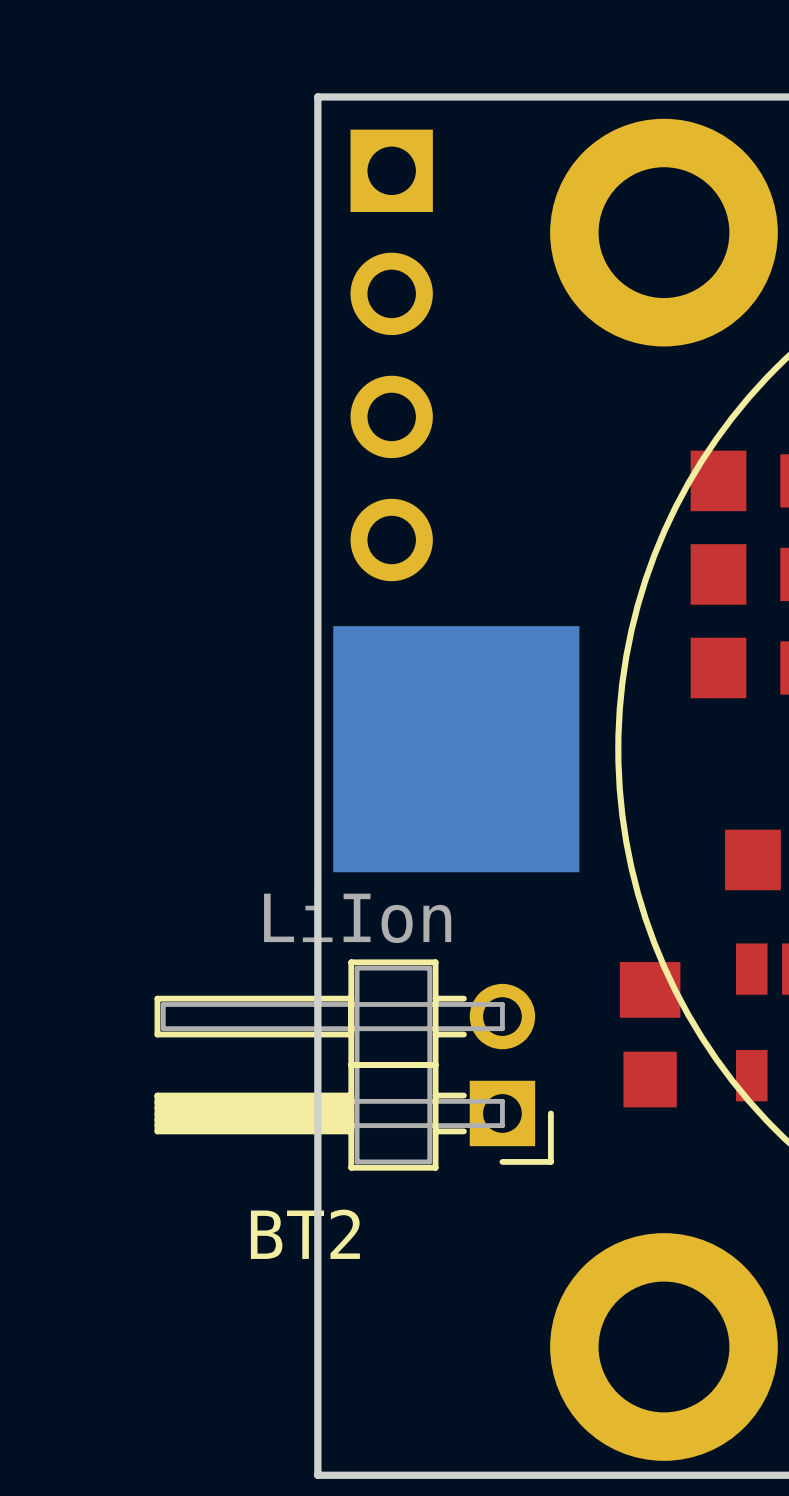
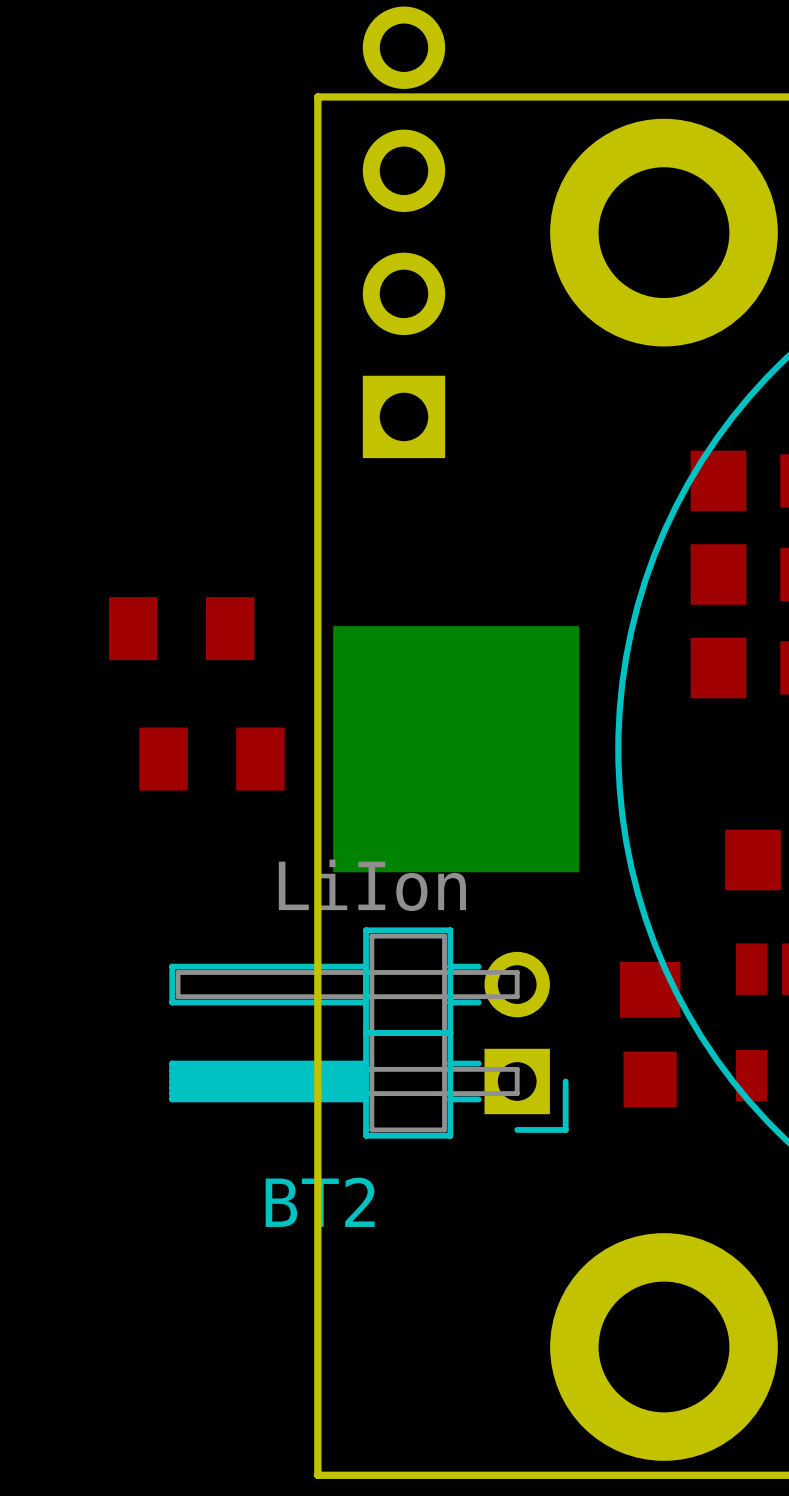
part rotation: 0° (391, 355) -> 180° (403, 232)
part: none -> (181, 628)
part: none -> (212, 759)
BT2 position: (354, 1065) -> (368, 1033)

